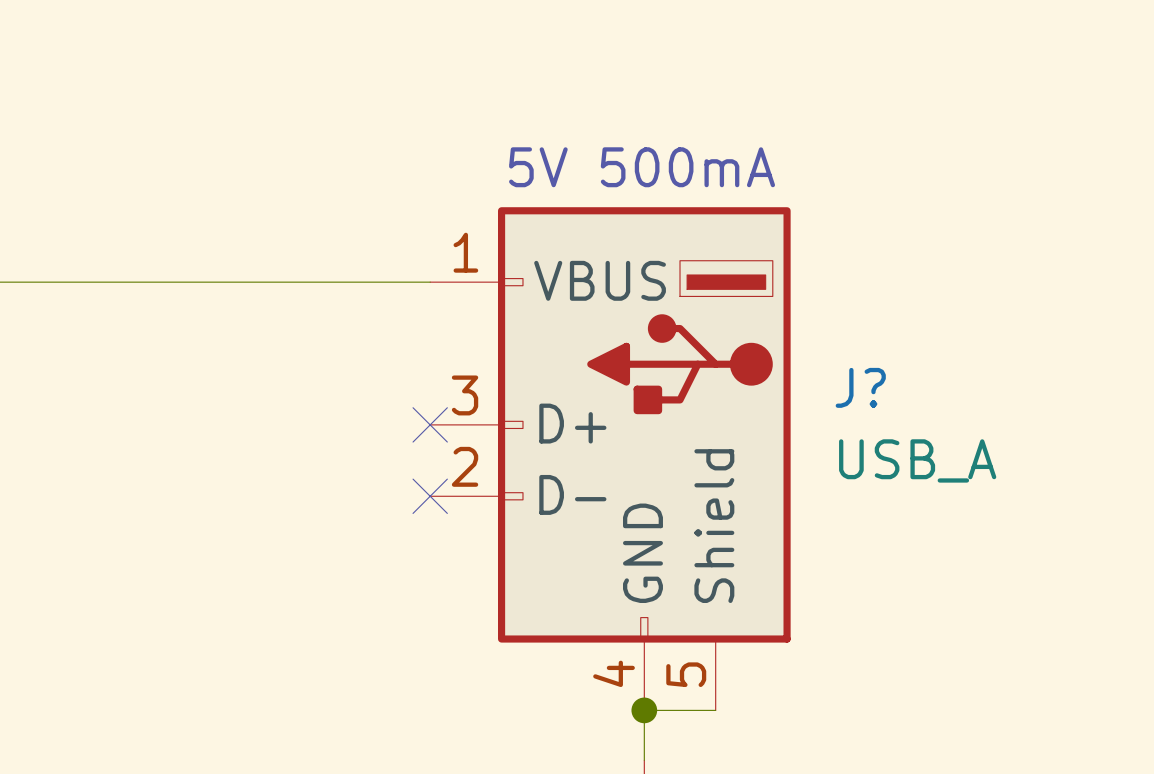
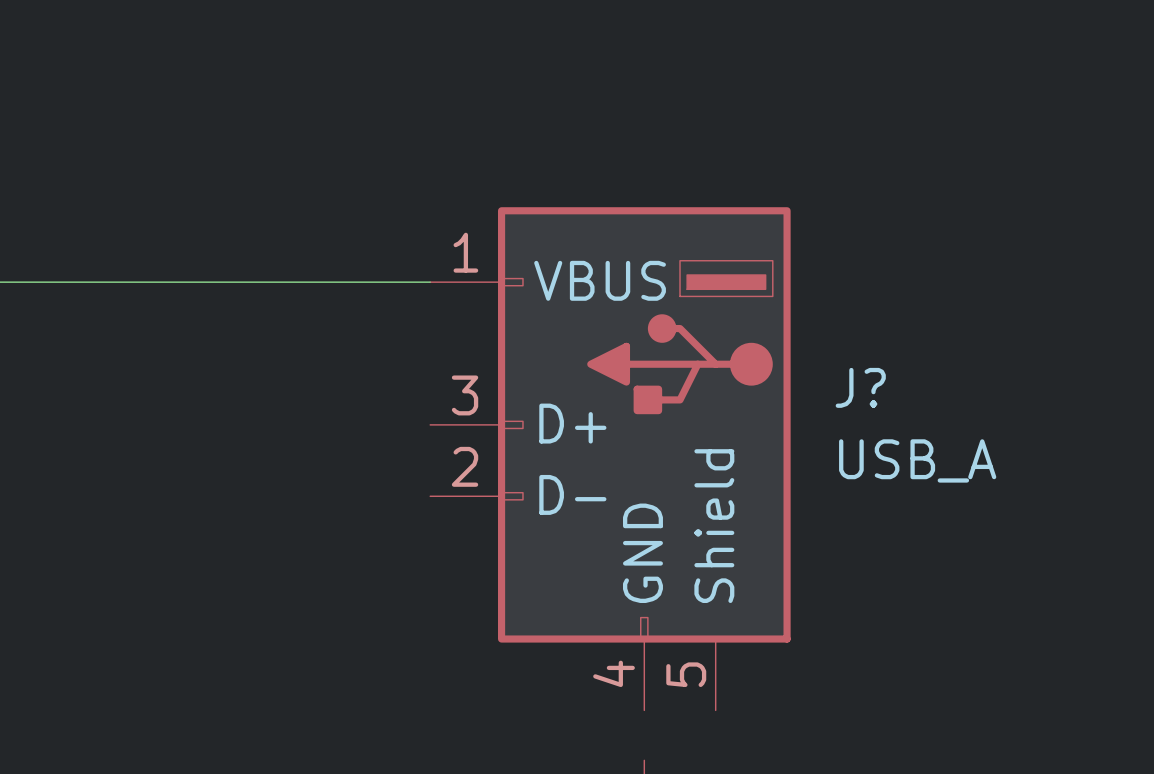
text: 5V 500mA (642, 167) -> none
no-connect mark: (430, 424) -> none
no-connect mark: (430, 496) -> none
junction: (644, 710) -> none
wire: (715, 710) (644, 710) (644, 760) -> none

